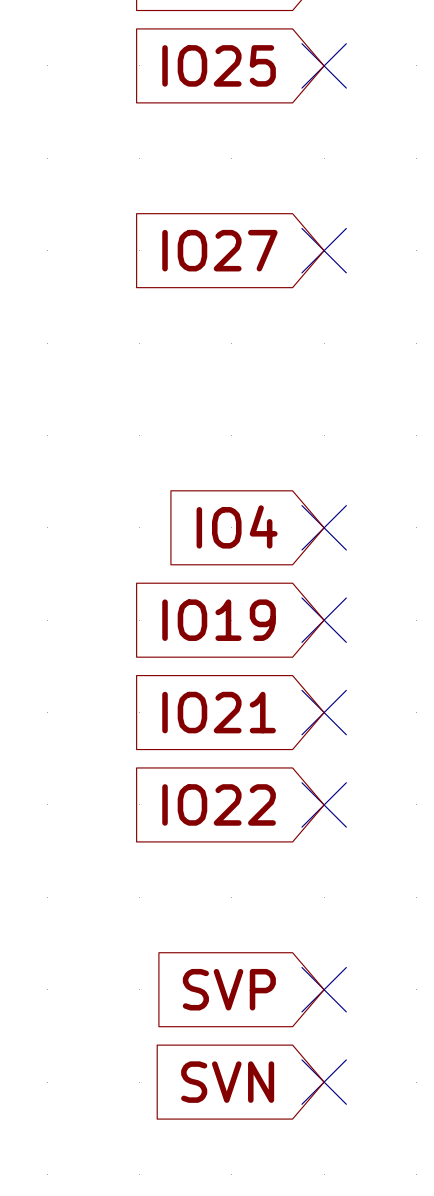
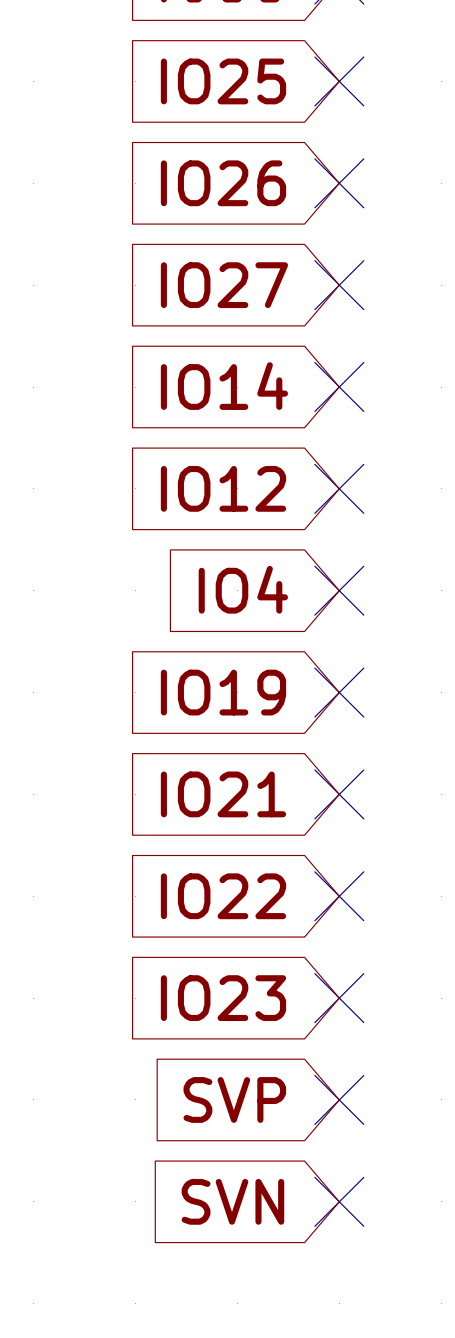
global label: none -> IO26 (223, 183)
no-connect mark: none -> (339, 183)
global label: none -> IO14 (224, 386)
no-connect mark: none -> (339, 387)
global label: none -> IO12 (223, 488)
no-connect mark: none -> (339, 488)
global label: none -> IO23 (223, 998)
no-connect mark: none -> (339, 998)

